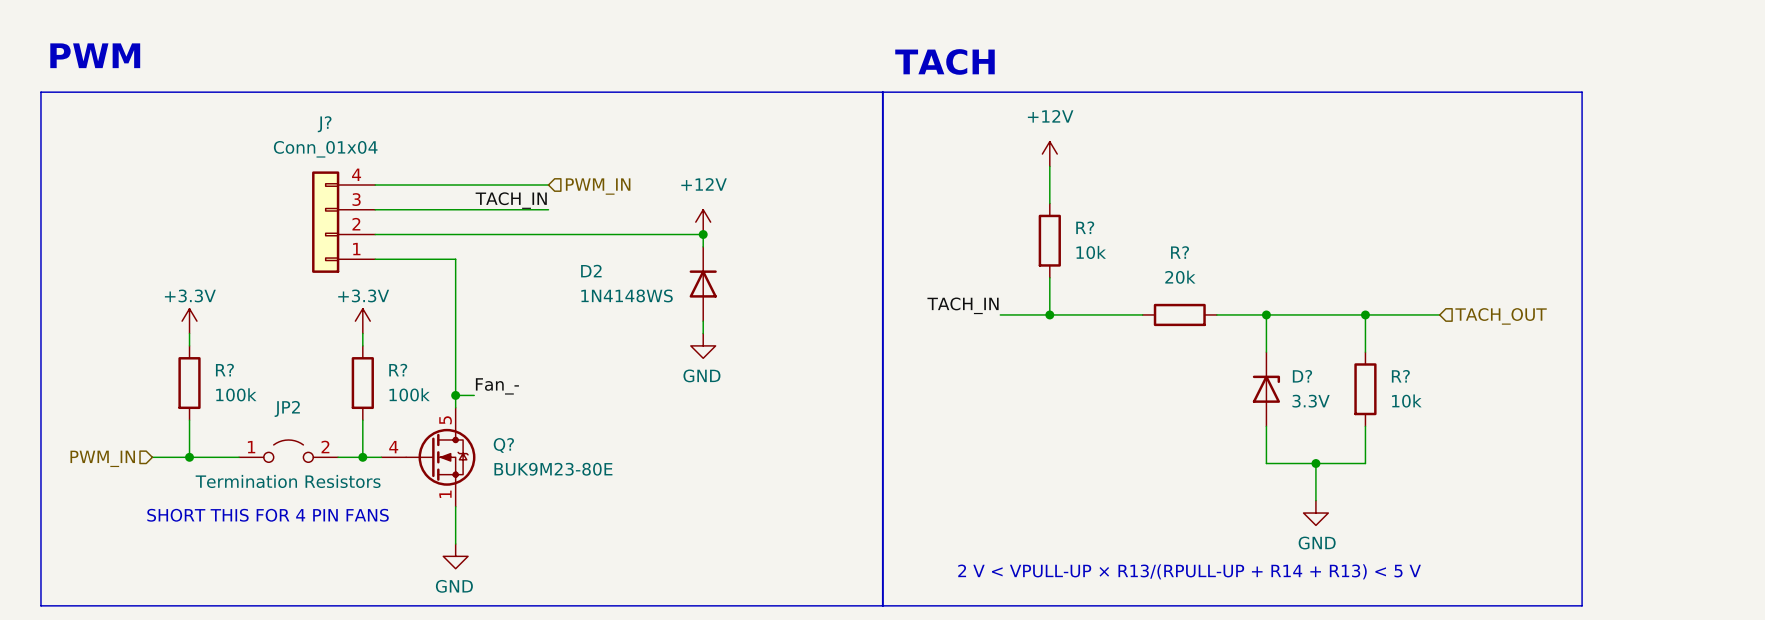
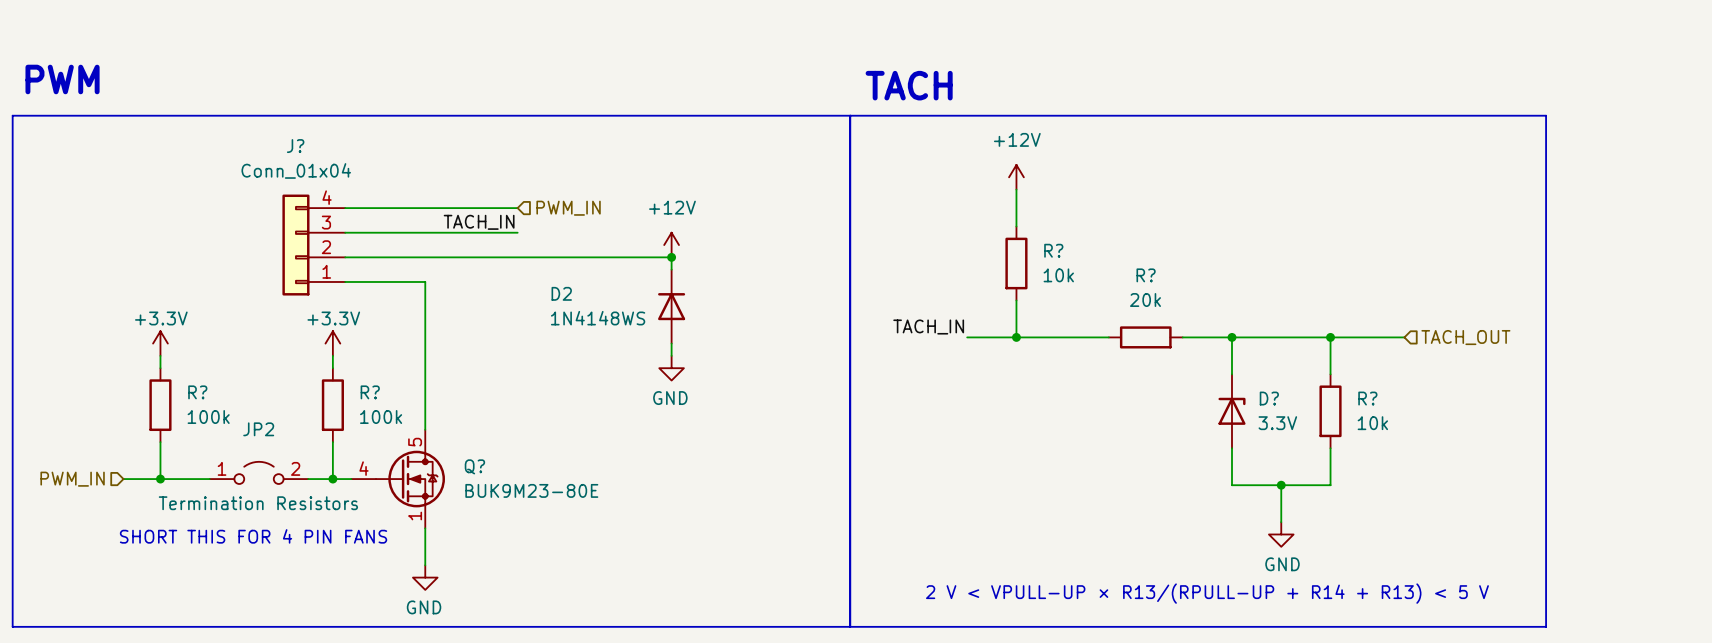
label: Fan_- (497, 386) -> none
wire: (455, 395) (474, 395) -> none
junction: (455, 395) -> none

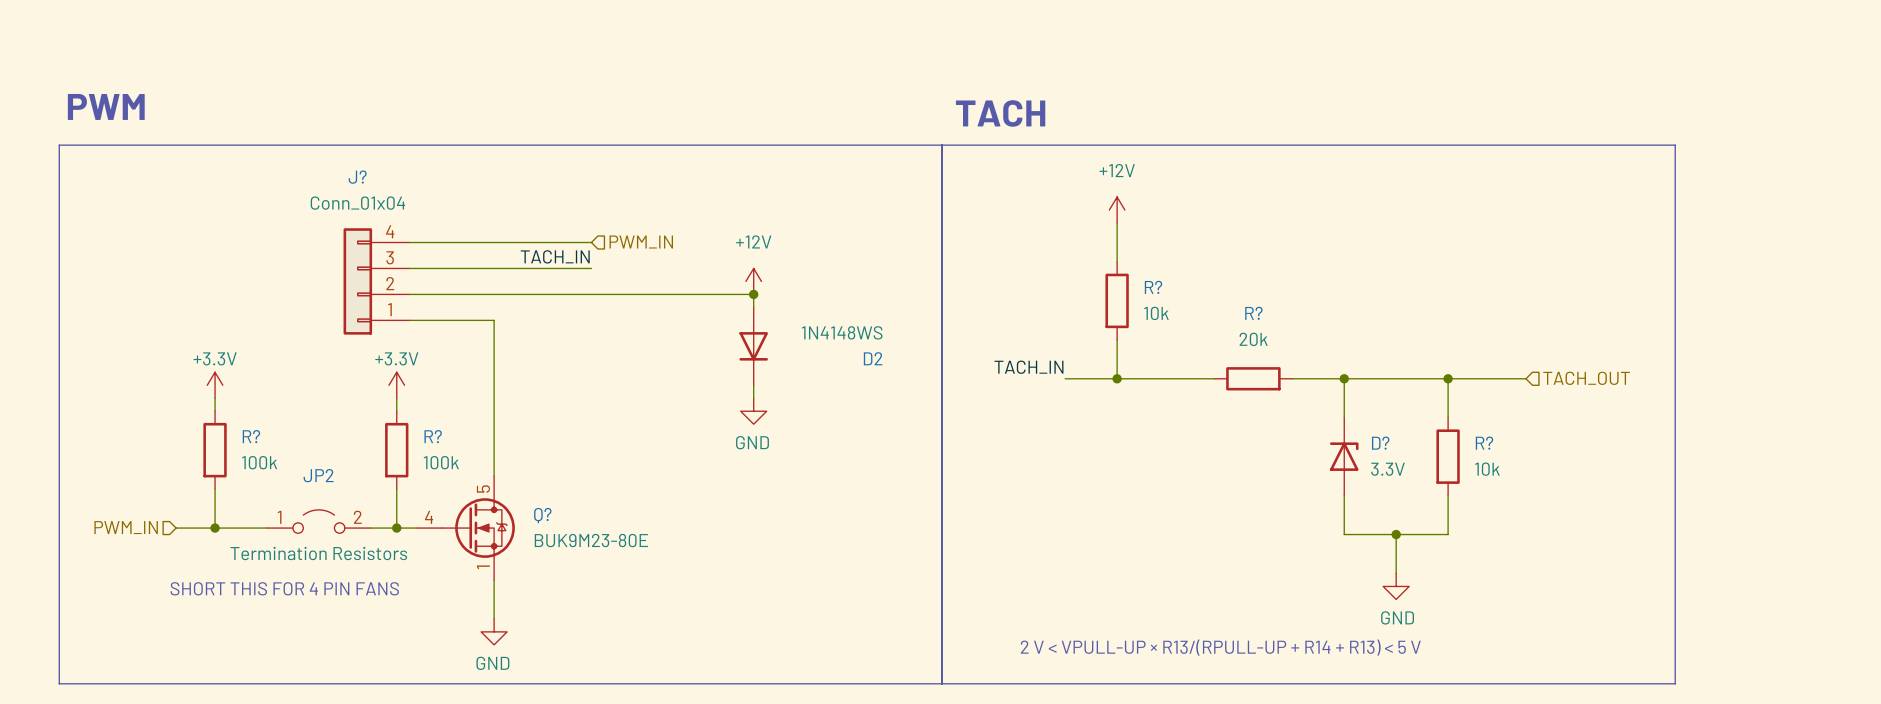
D2 rotation: 0° (671, 306) -> 180° (753, 346)

